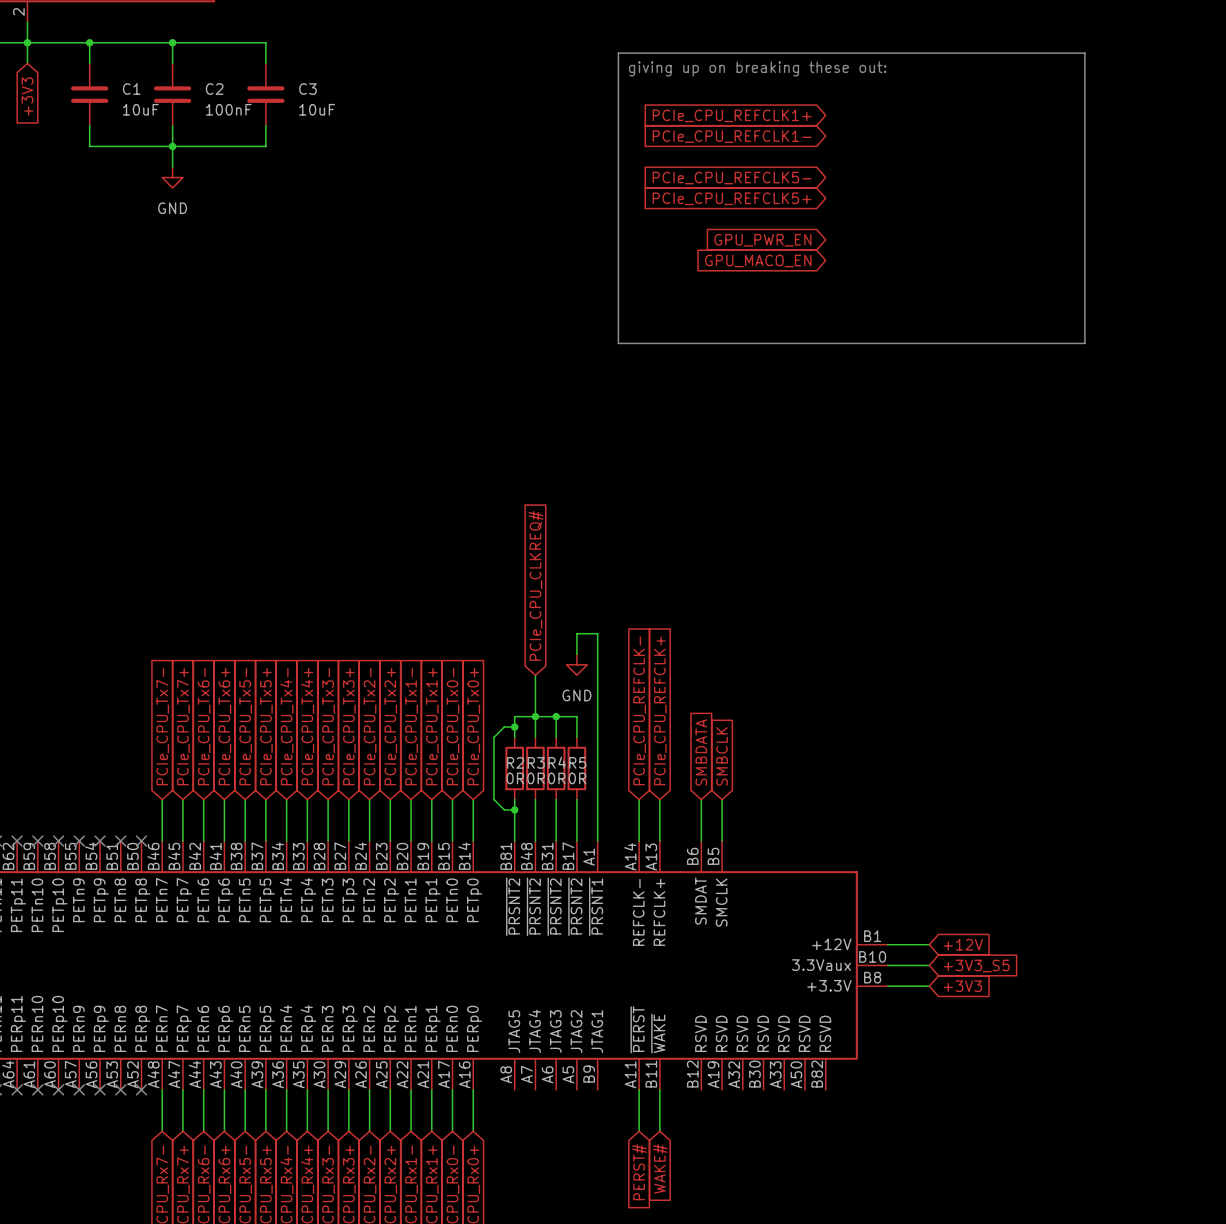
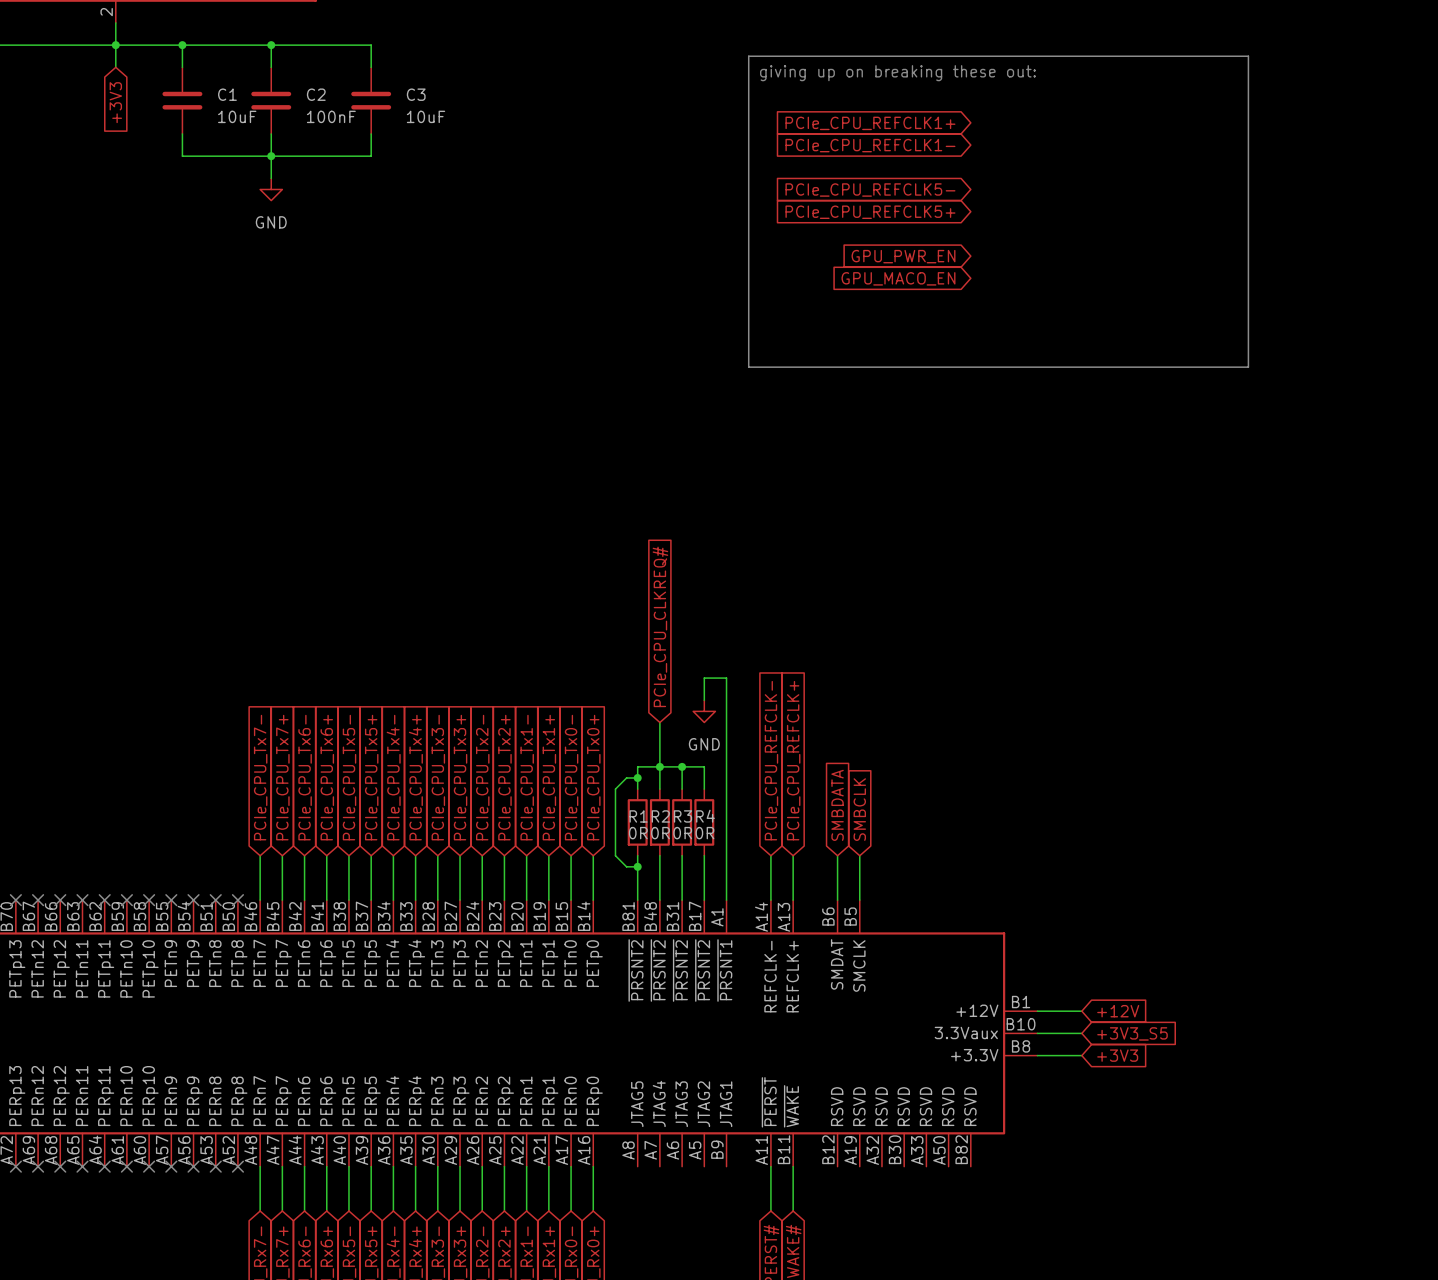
R2 name: R2 (515, 762) -> R1 (638, 816)
R3 name: R3 (536, 762) -> R2 (660, 816)
R4 name: R4 (557, 762) -> R3 (682, 816)
R5 name: R5 (577, 762) -> R4 (705, 816)

